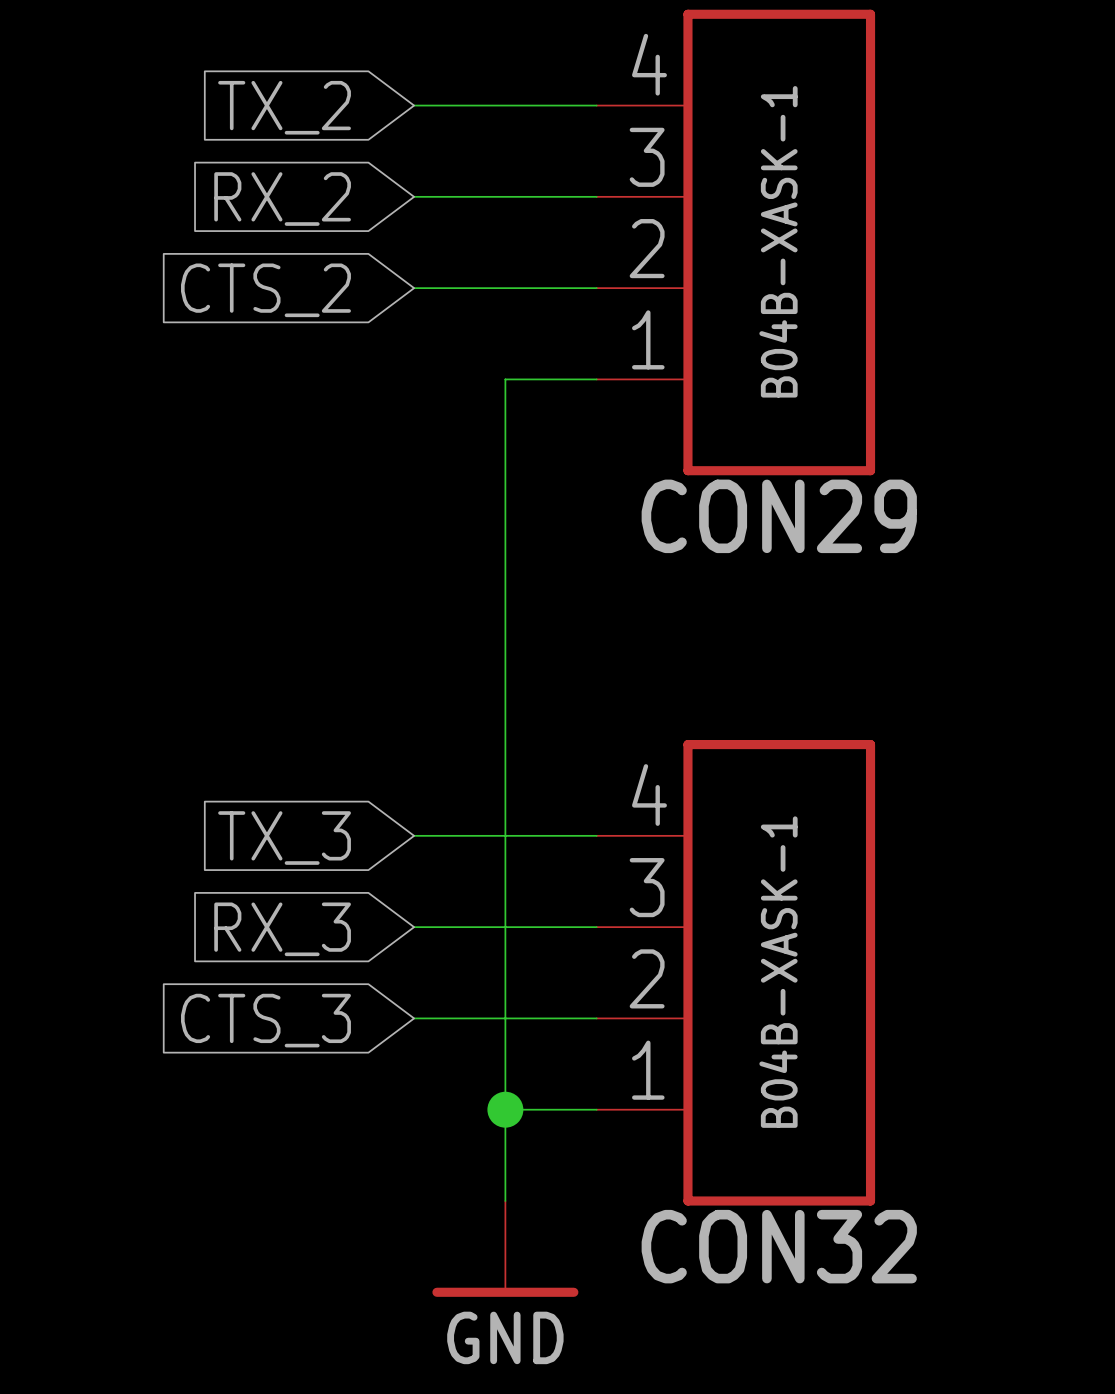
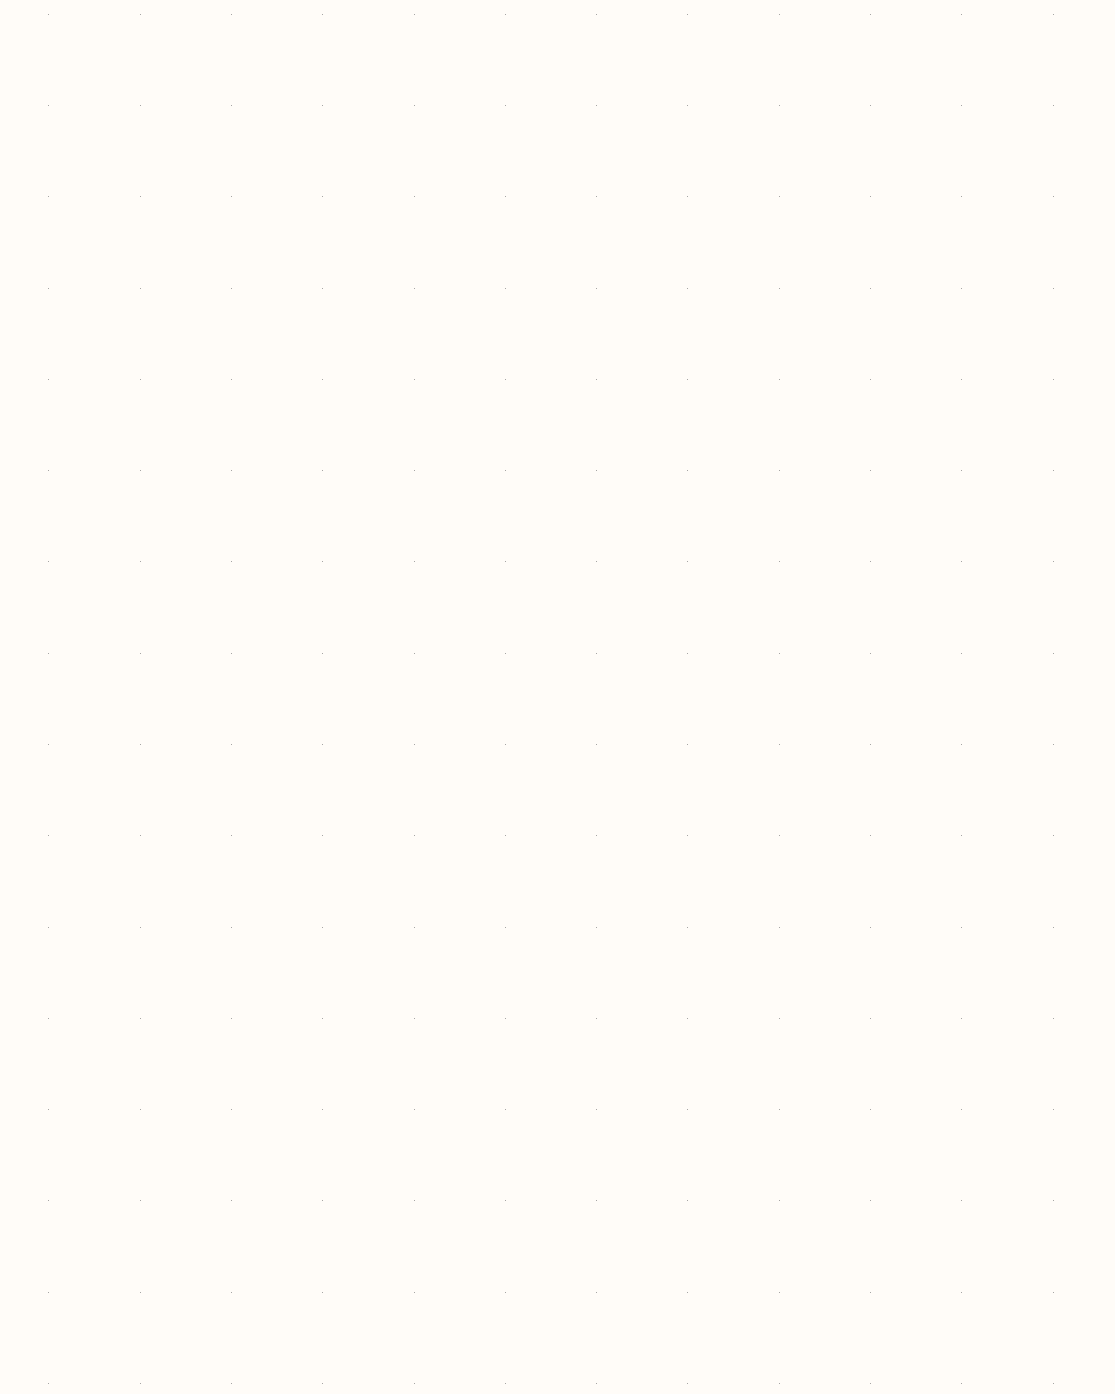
wire: (414, 105) (596, 105) -> none
global label: TX_2 (284, 107) -> none
wire: (414, 196) (596, 196) -> none
global label: RX_2 (282, 199) -> none
CON29: (735, 242) -> none
wire: (414, 288) (596, 288) -> none
global label: CTS_2 (265, 290) -> none
wire: (596, 379) (505, 379) (505, 1200) -> none
wire: (414, 835) (596, 835) -> none
global label: TX_3 (284, 838) -> none
wire: (414, 927) (596, 927) -> none
global label: RX_3 (282, 929) -> none
CON32: (735, 972) -> none
wire: (414, 1018) (596, 1018) -> none
global label: CTS_3 (265, 1020) -> none
wire: (505, 1109) (596, 1109) -> none
junction: (505, 1109) -> none
power symbol: GND (505, 1248) -> none

